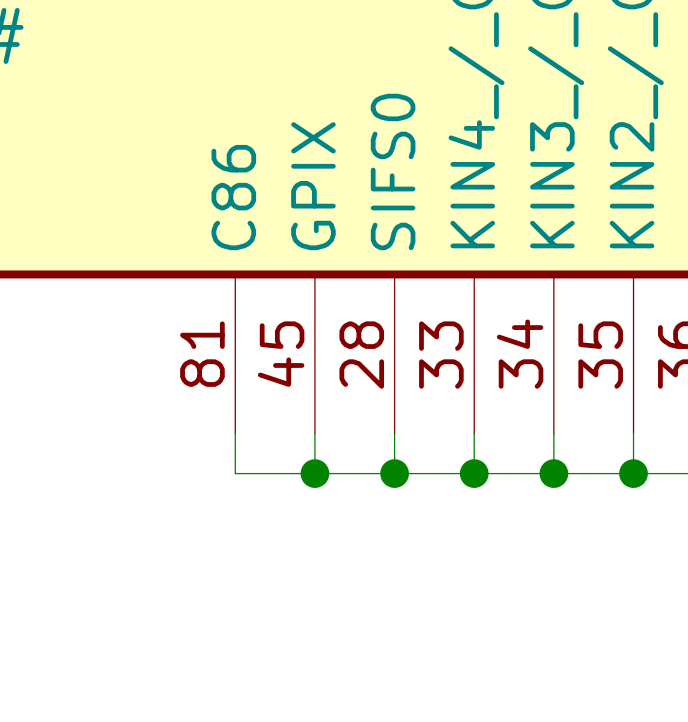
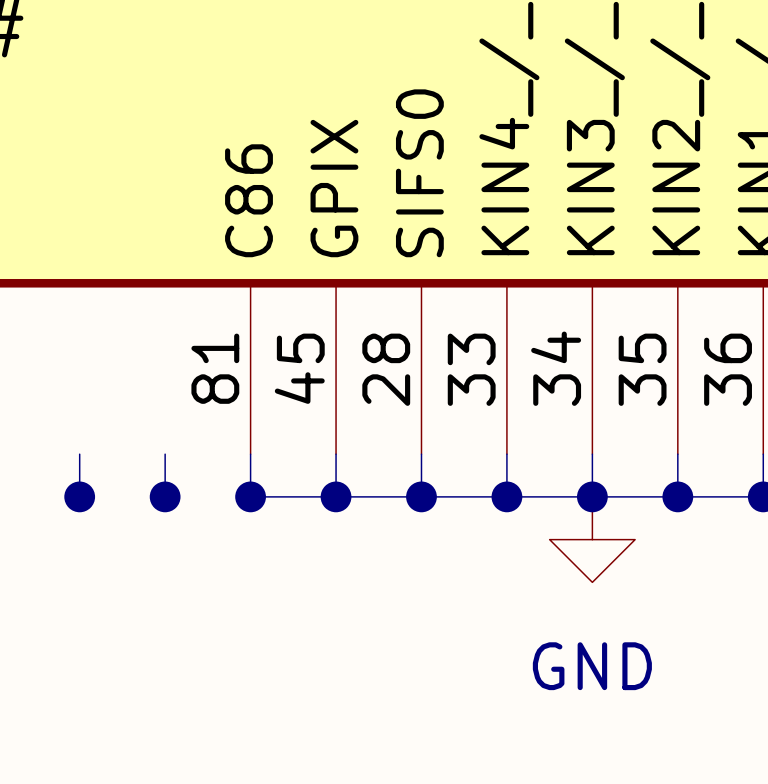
wire: none -> (79, 454) (79, 496)
wire: none -> (165, 454) (165, 496)
junction: none -> (79, 496)
junction: none -> (165, 496)
junction: none -> (250, 496)
power symbol: none -> GND (592, 539)

